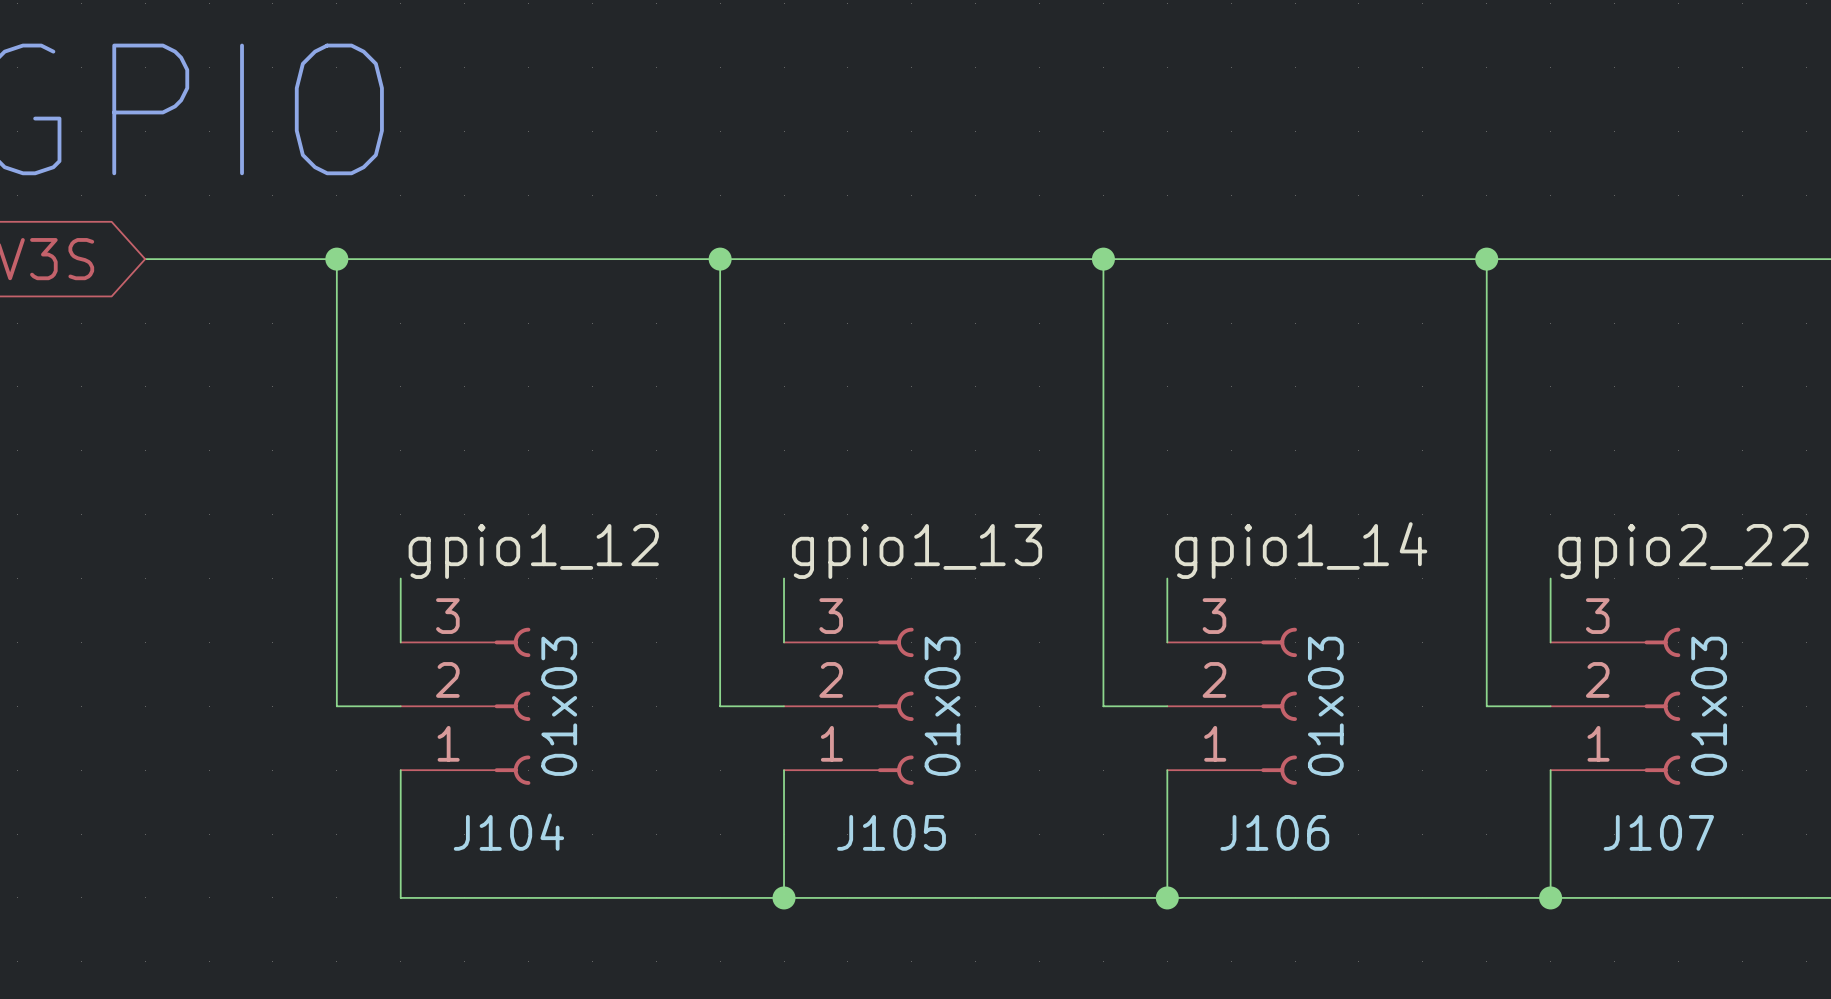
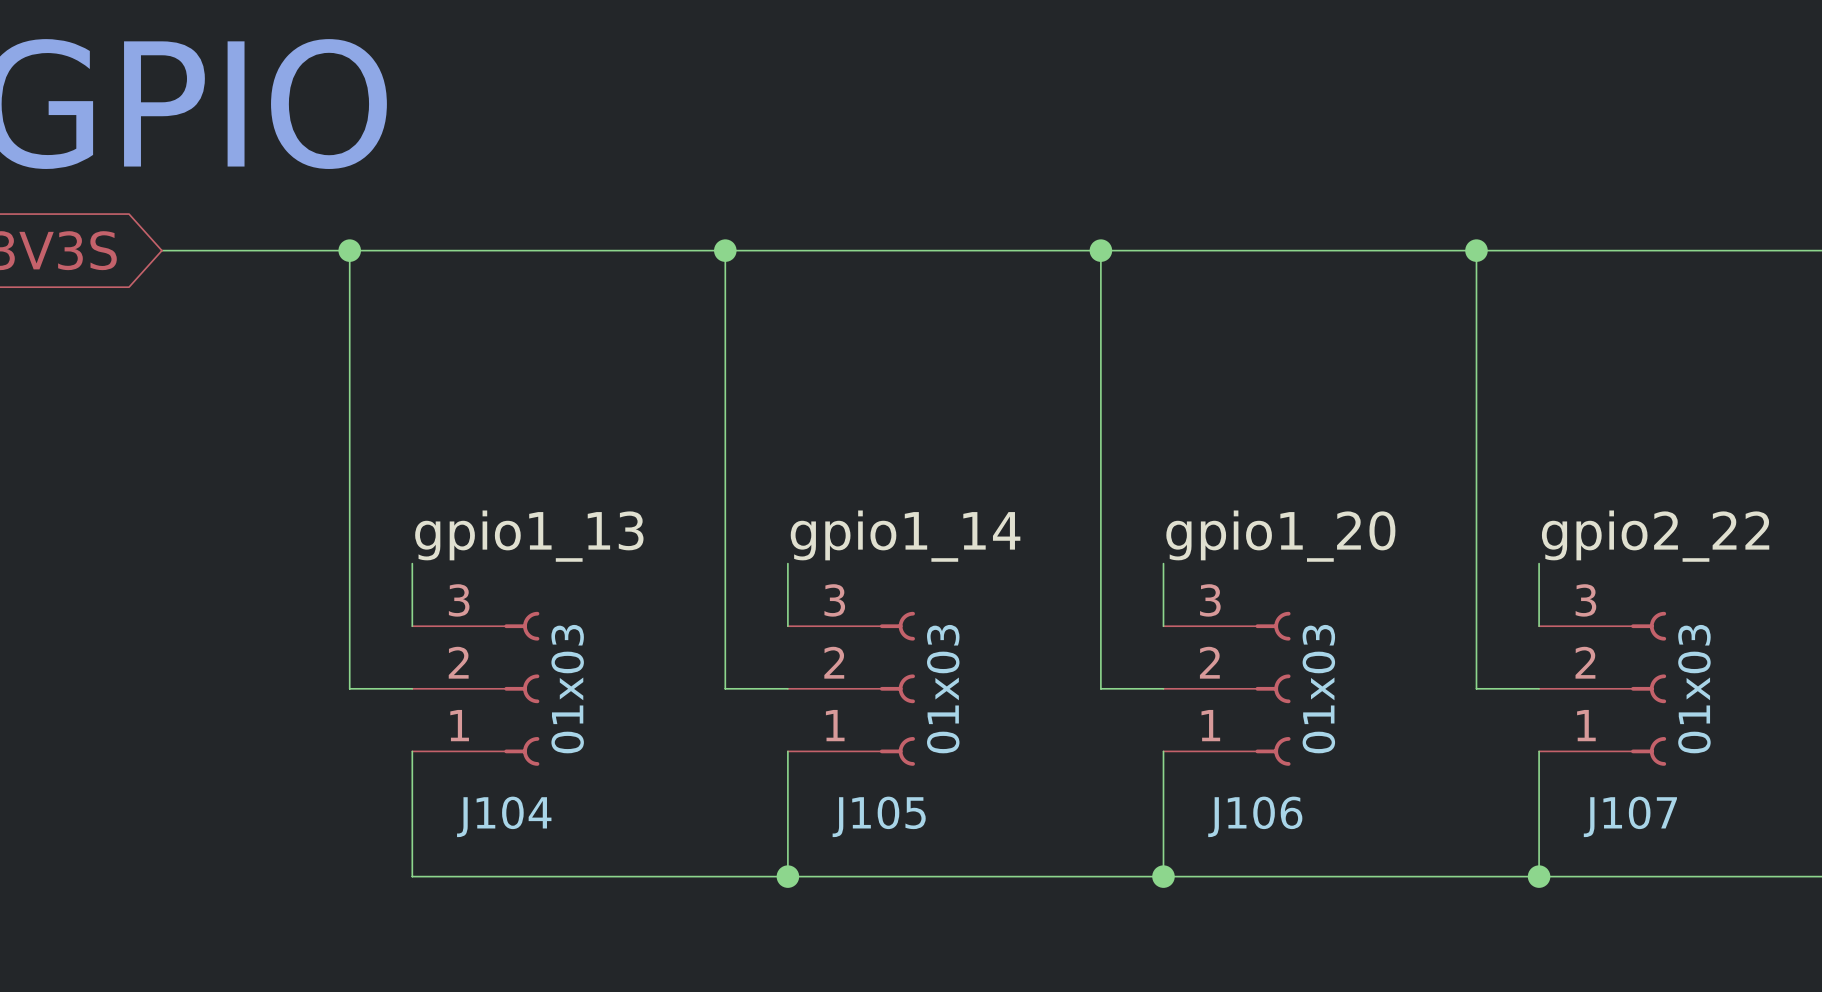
label: gpio1_14 (1301, 550) -> gpio1_20 (1280, 536)
label: gpio1_12 (533, 551) -> gpio1_13 (529, 536)
label: gpio1_13 (917, 551) -> gpio1_14 (905, 536)

